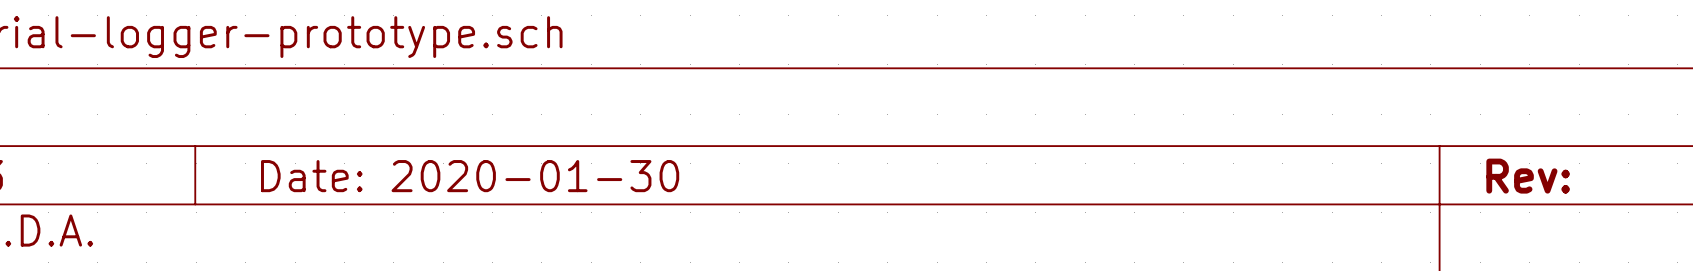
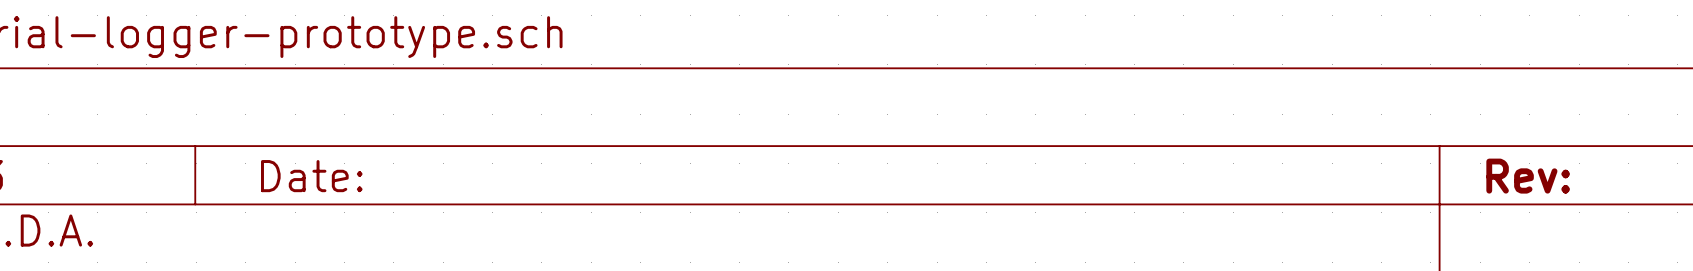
title block: Date: 2020-01-30 (470, 176) -> Date: (311, 176)

